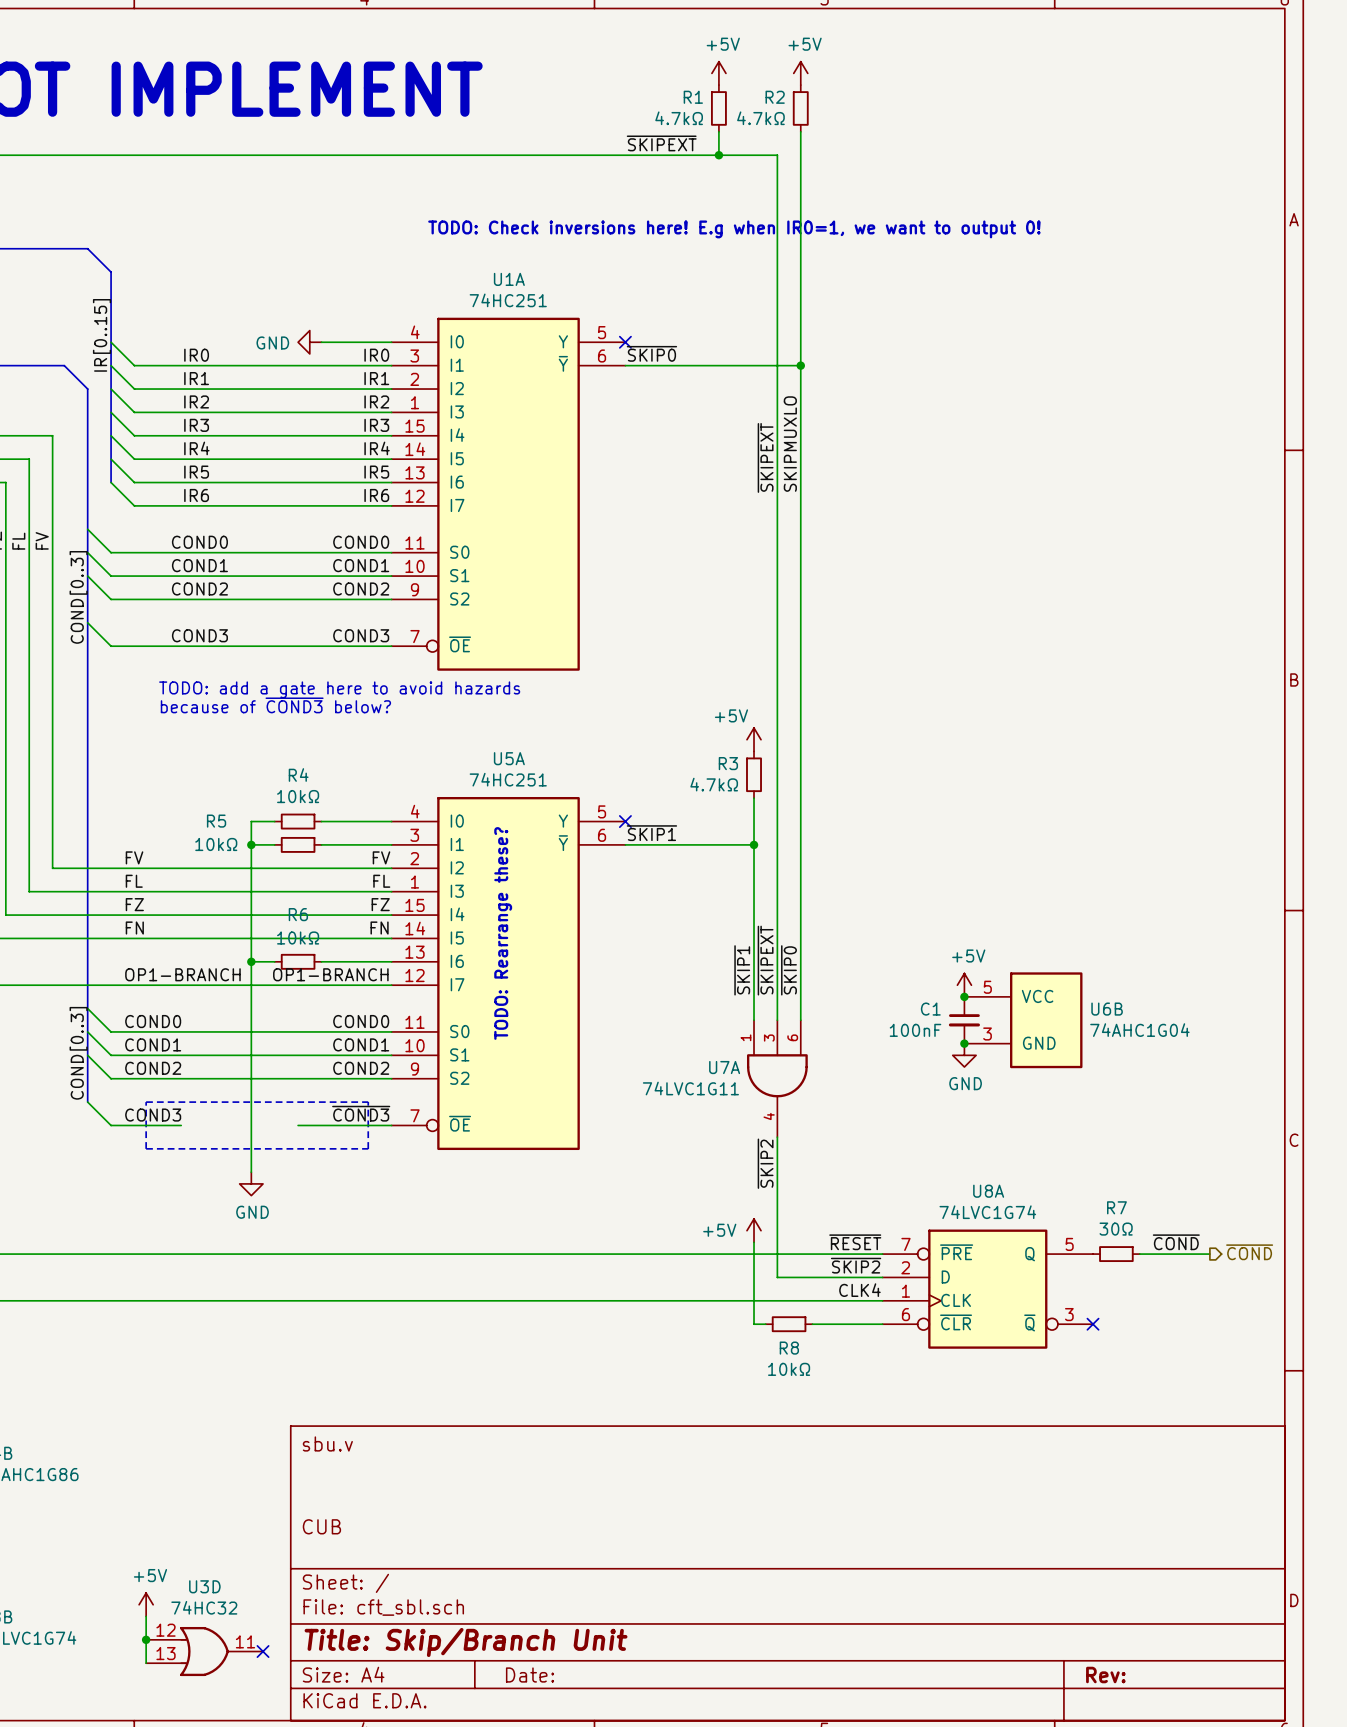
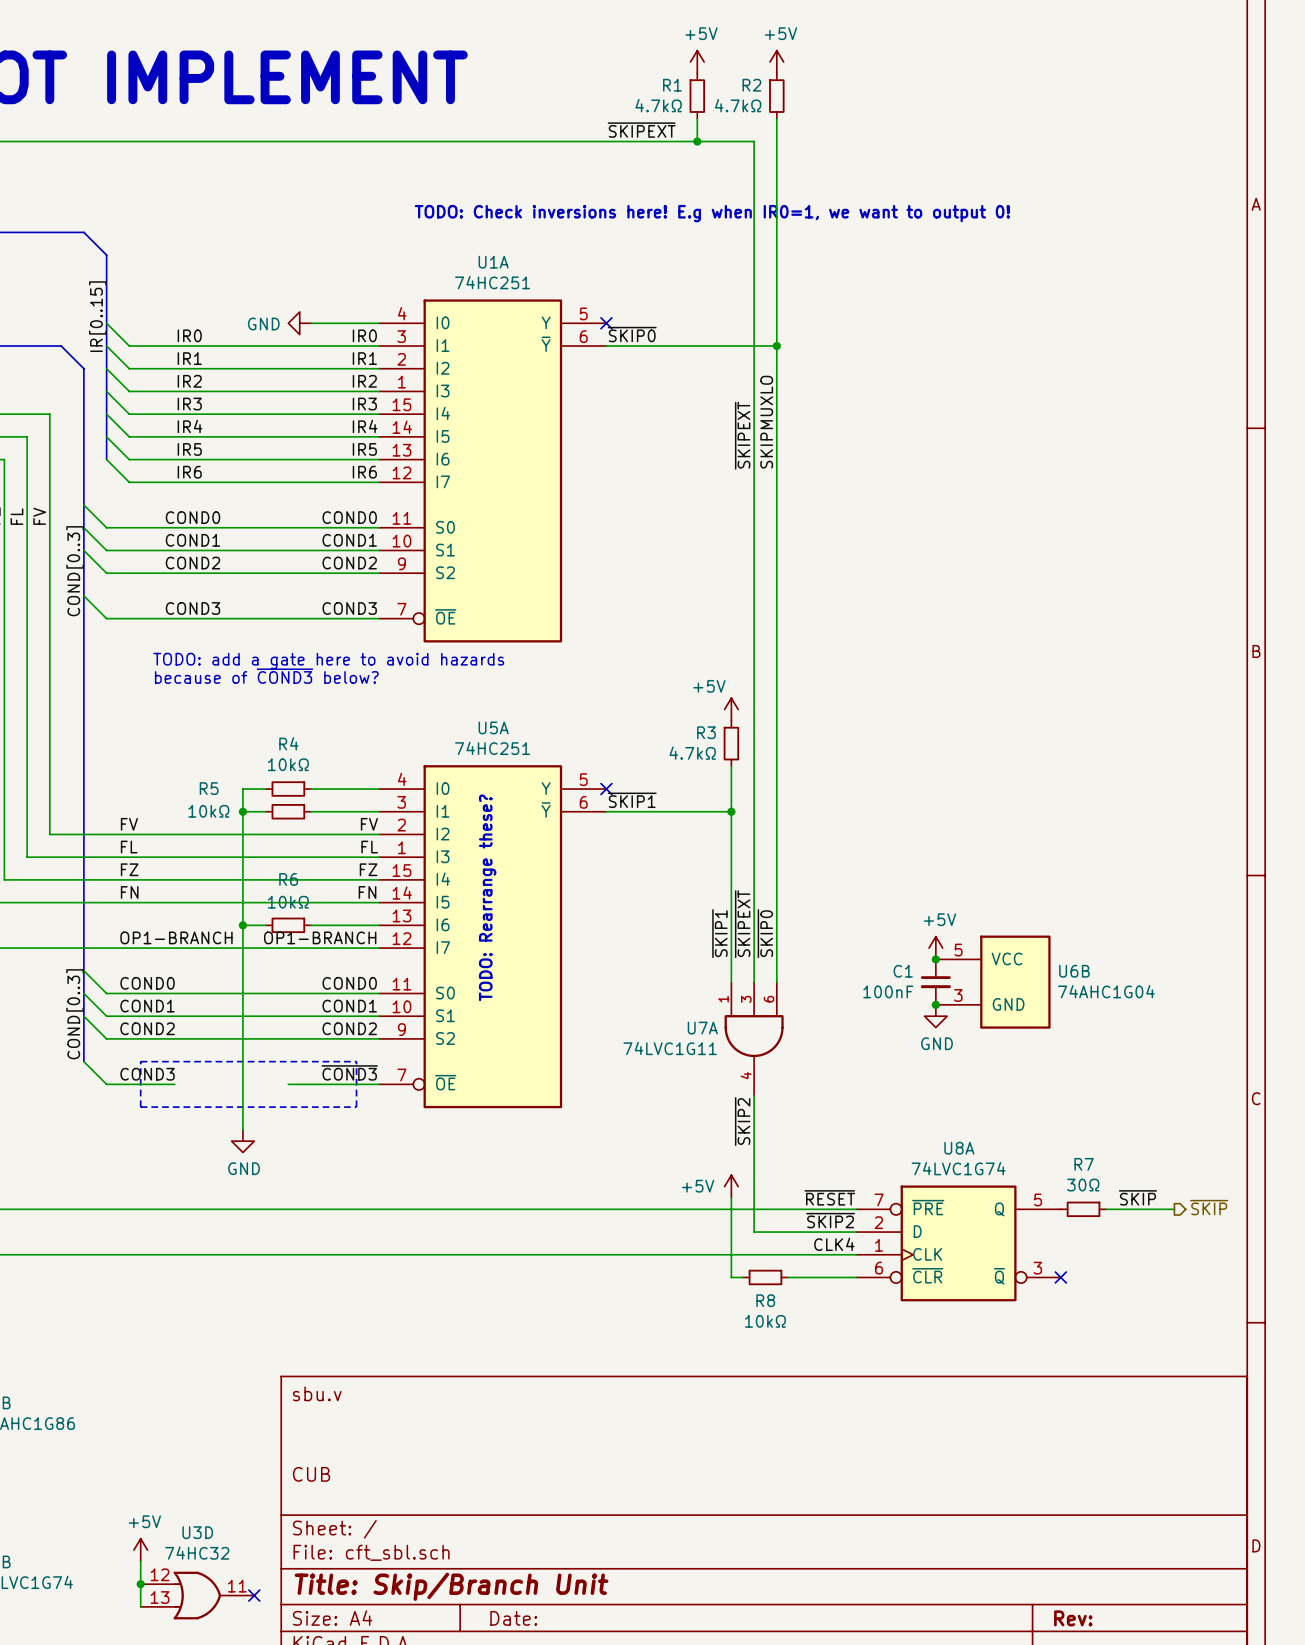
label: ~{COND} (1176, 1242) -> ~{SKIP} (1137, 1197)
hierarchical label: ~{COND} (1249, 1252) -> ~{SKIP} (1209, 1207)

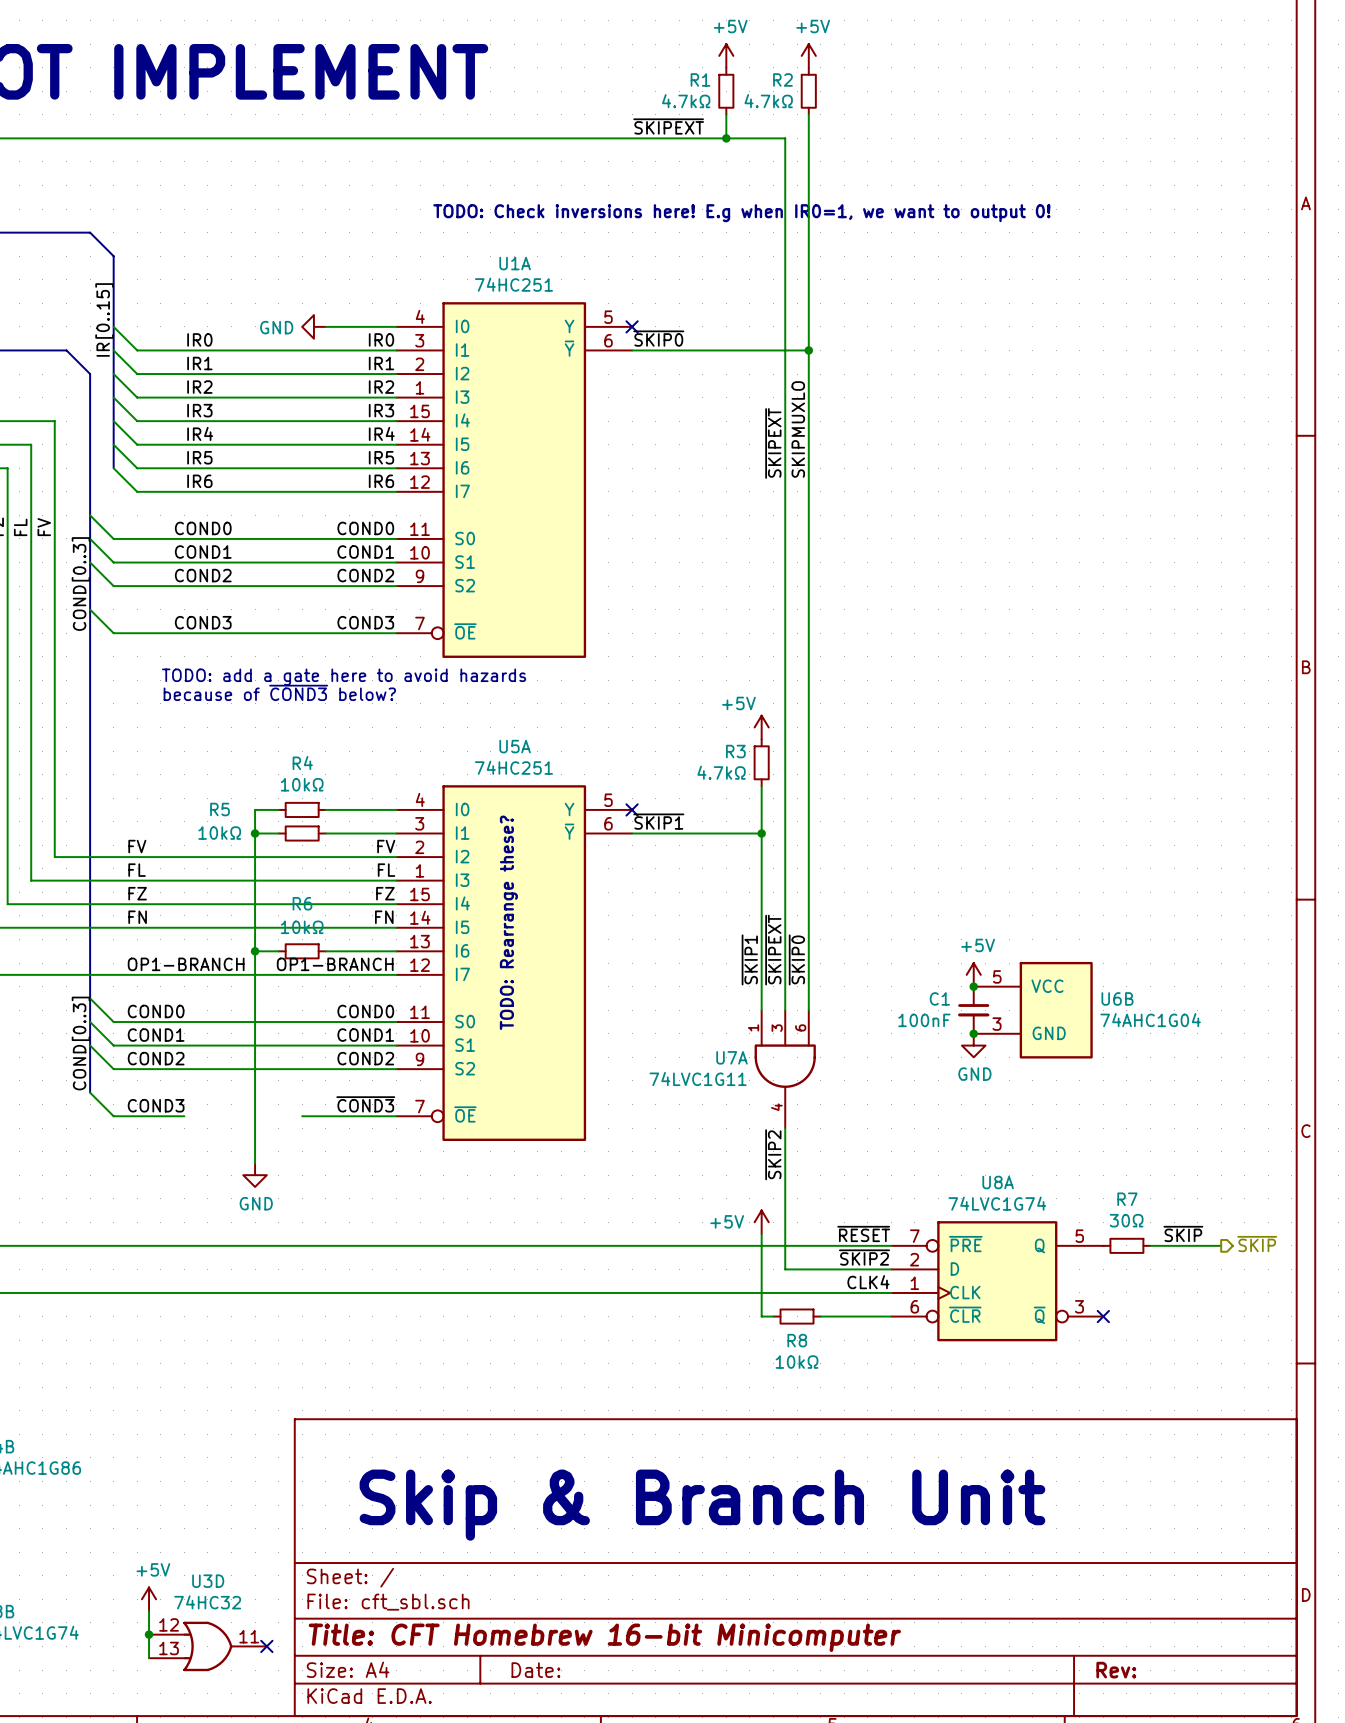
line: (140, 1061) (356, 1061) (356, 1107) (140, 1107) (140, 1061) -> none
title block: sbu.v (317, 1393) -> none
text: none -> Skip & Branch Unit (702, 1505)
title block: CUB (311, 1474) -> none
title block: Title: Skip/Branch Unit (451, 1586) -> Title: CFT Homebrew 16-bit Minicomputer (604, 1637)

